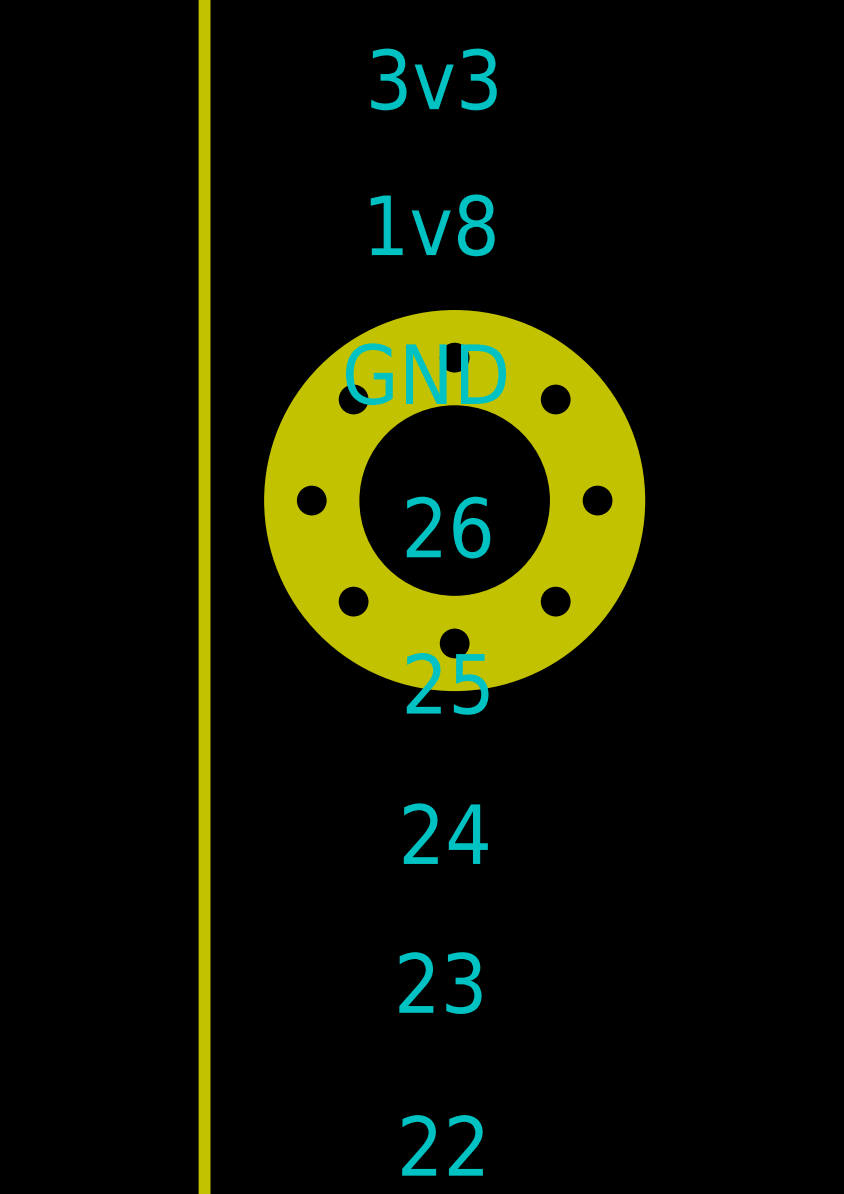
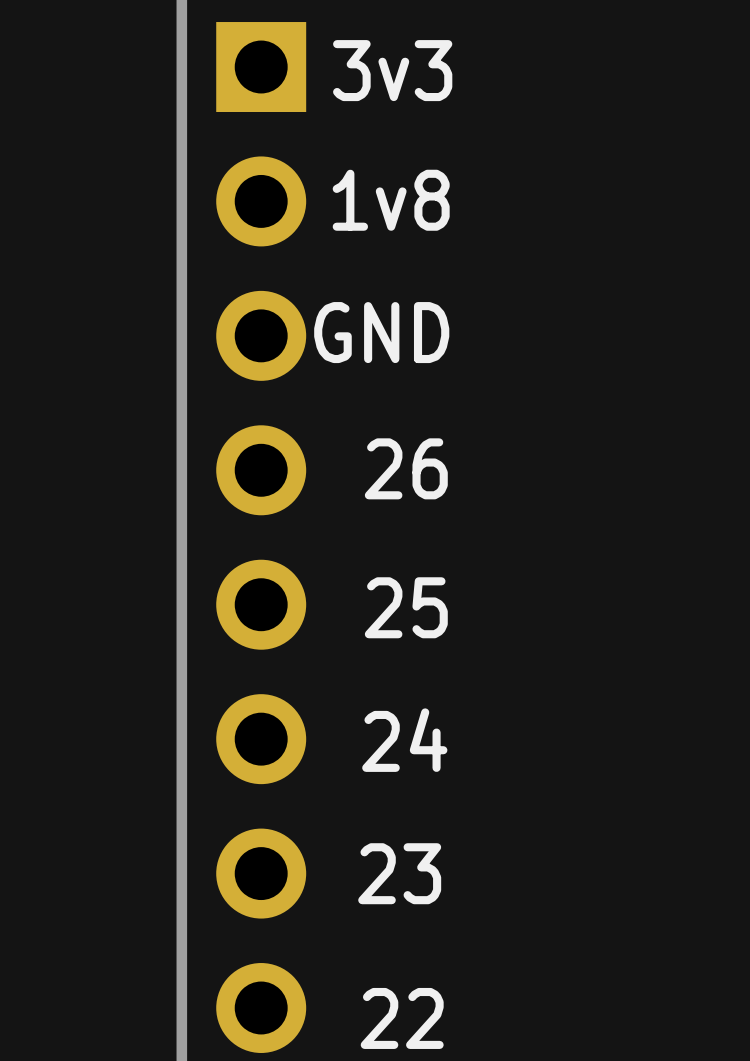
part: (454, 500) -> none
part: none -> (261, 537)

